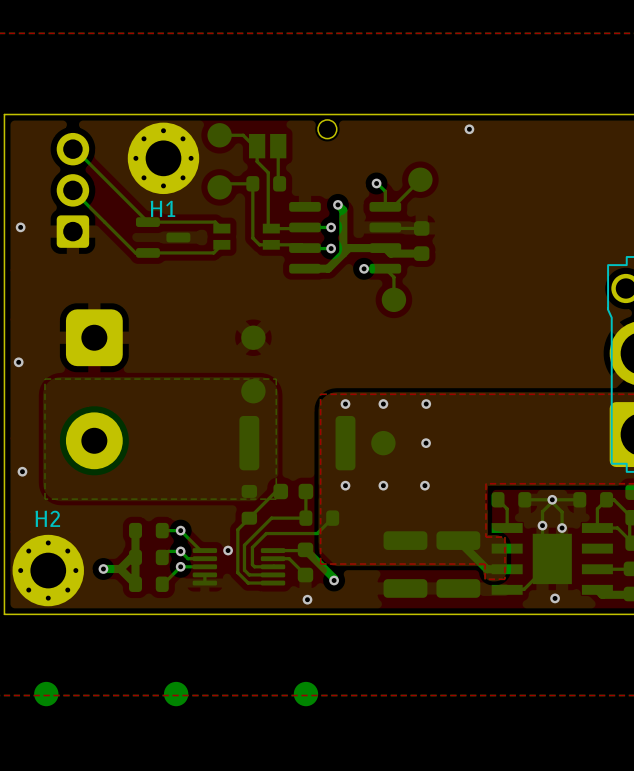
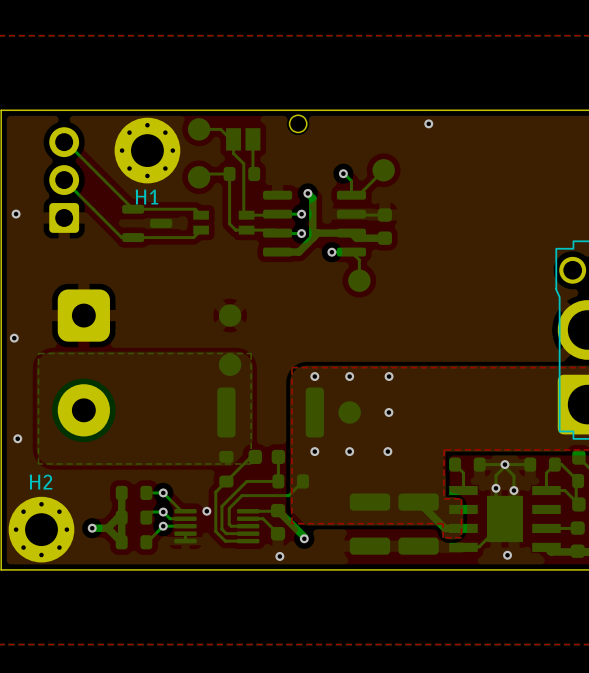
part: (46, 694) -> none
part: (176, 694) -> none
part: (305, 694) -> none

